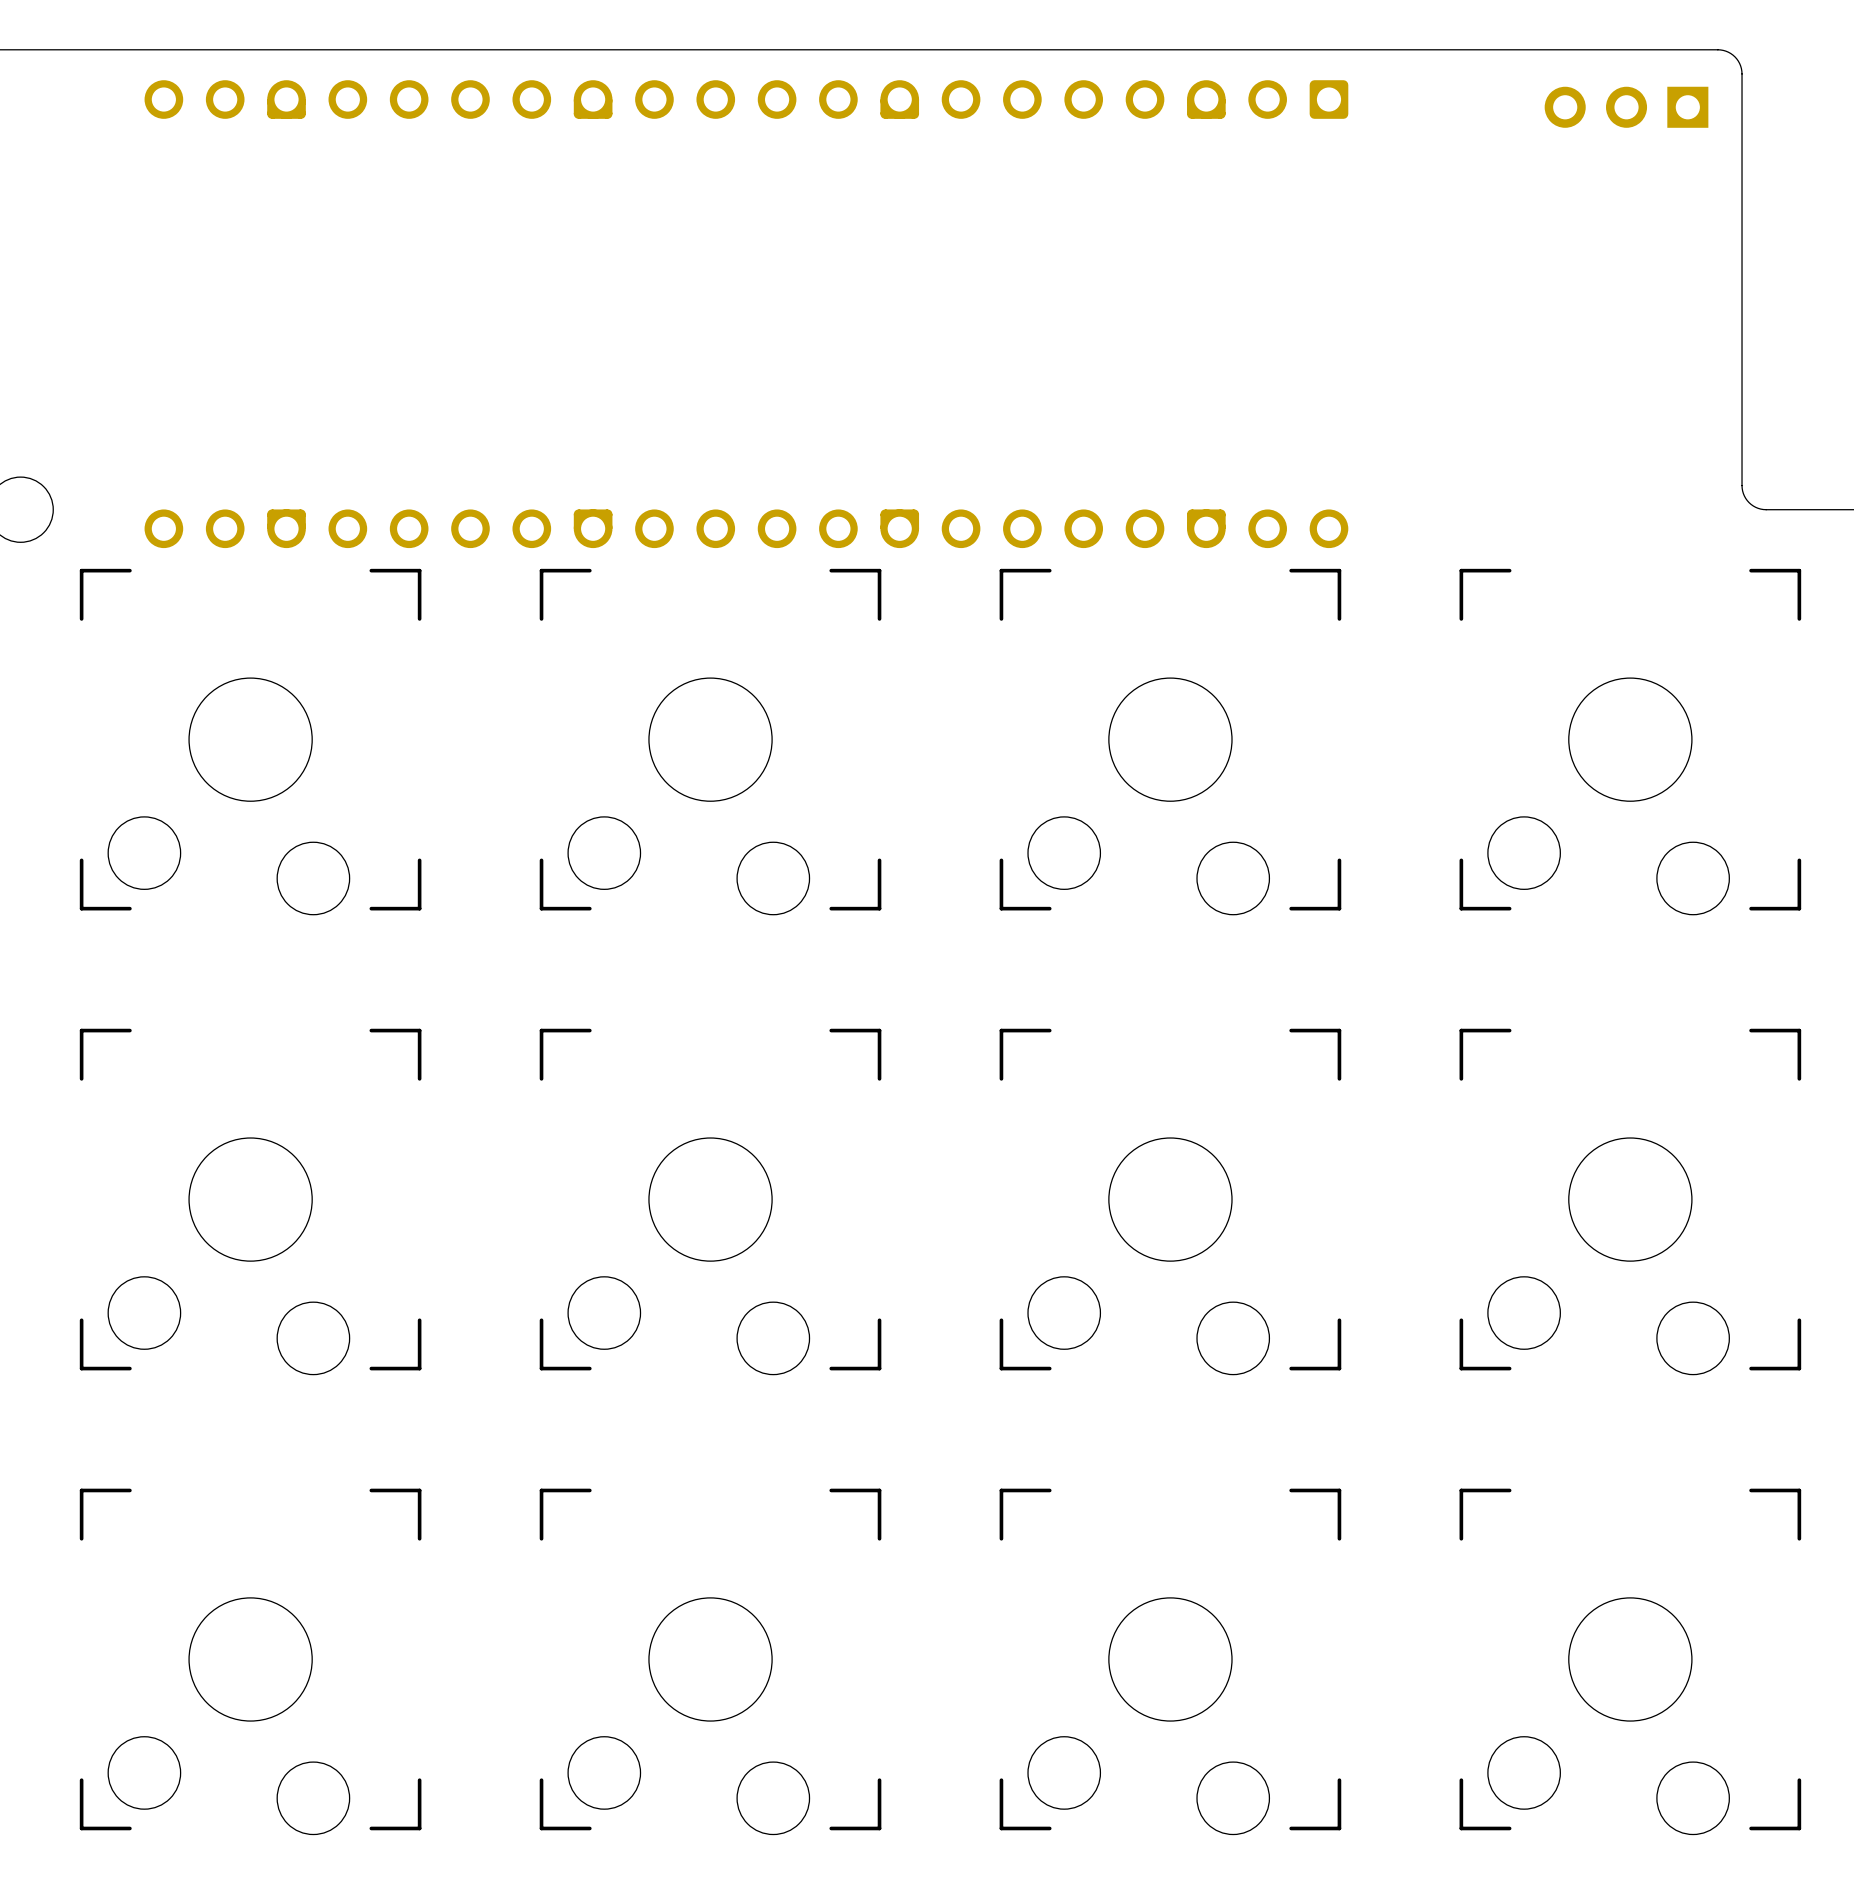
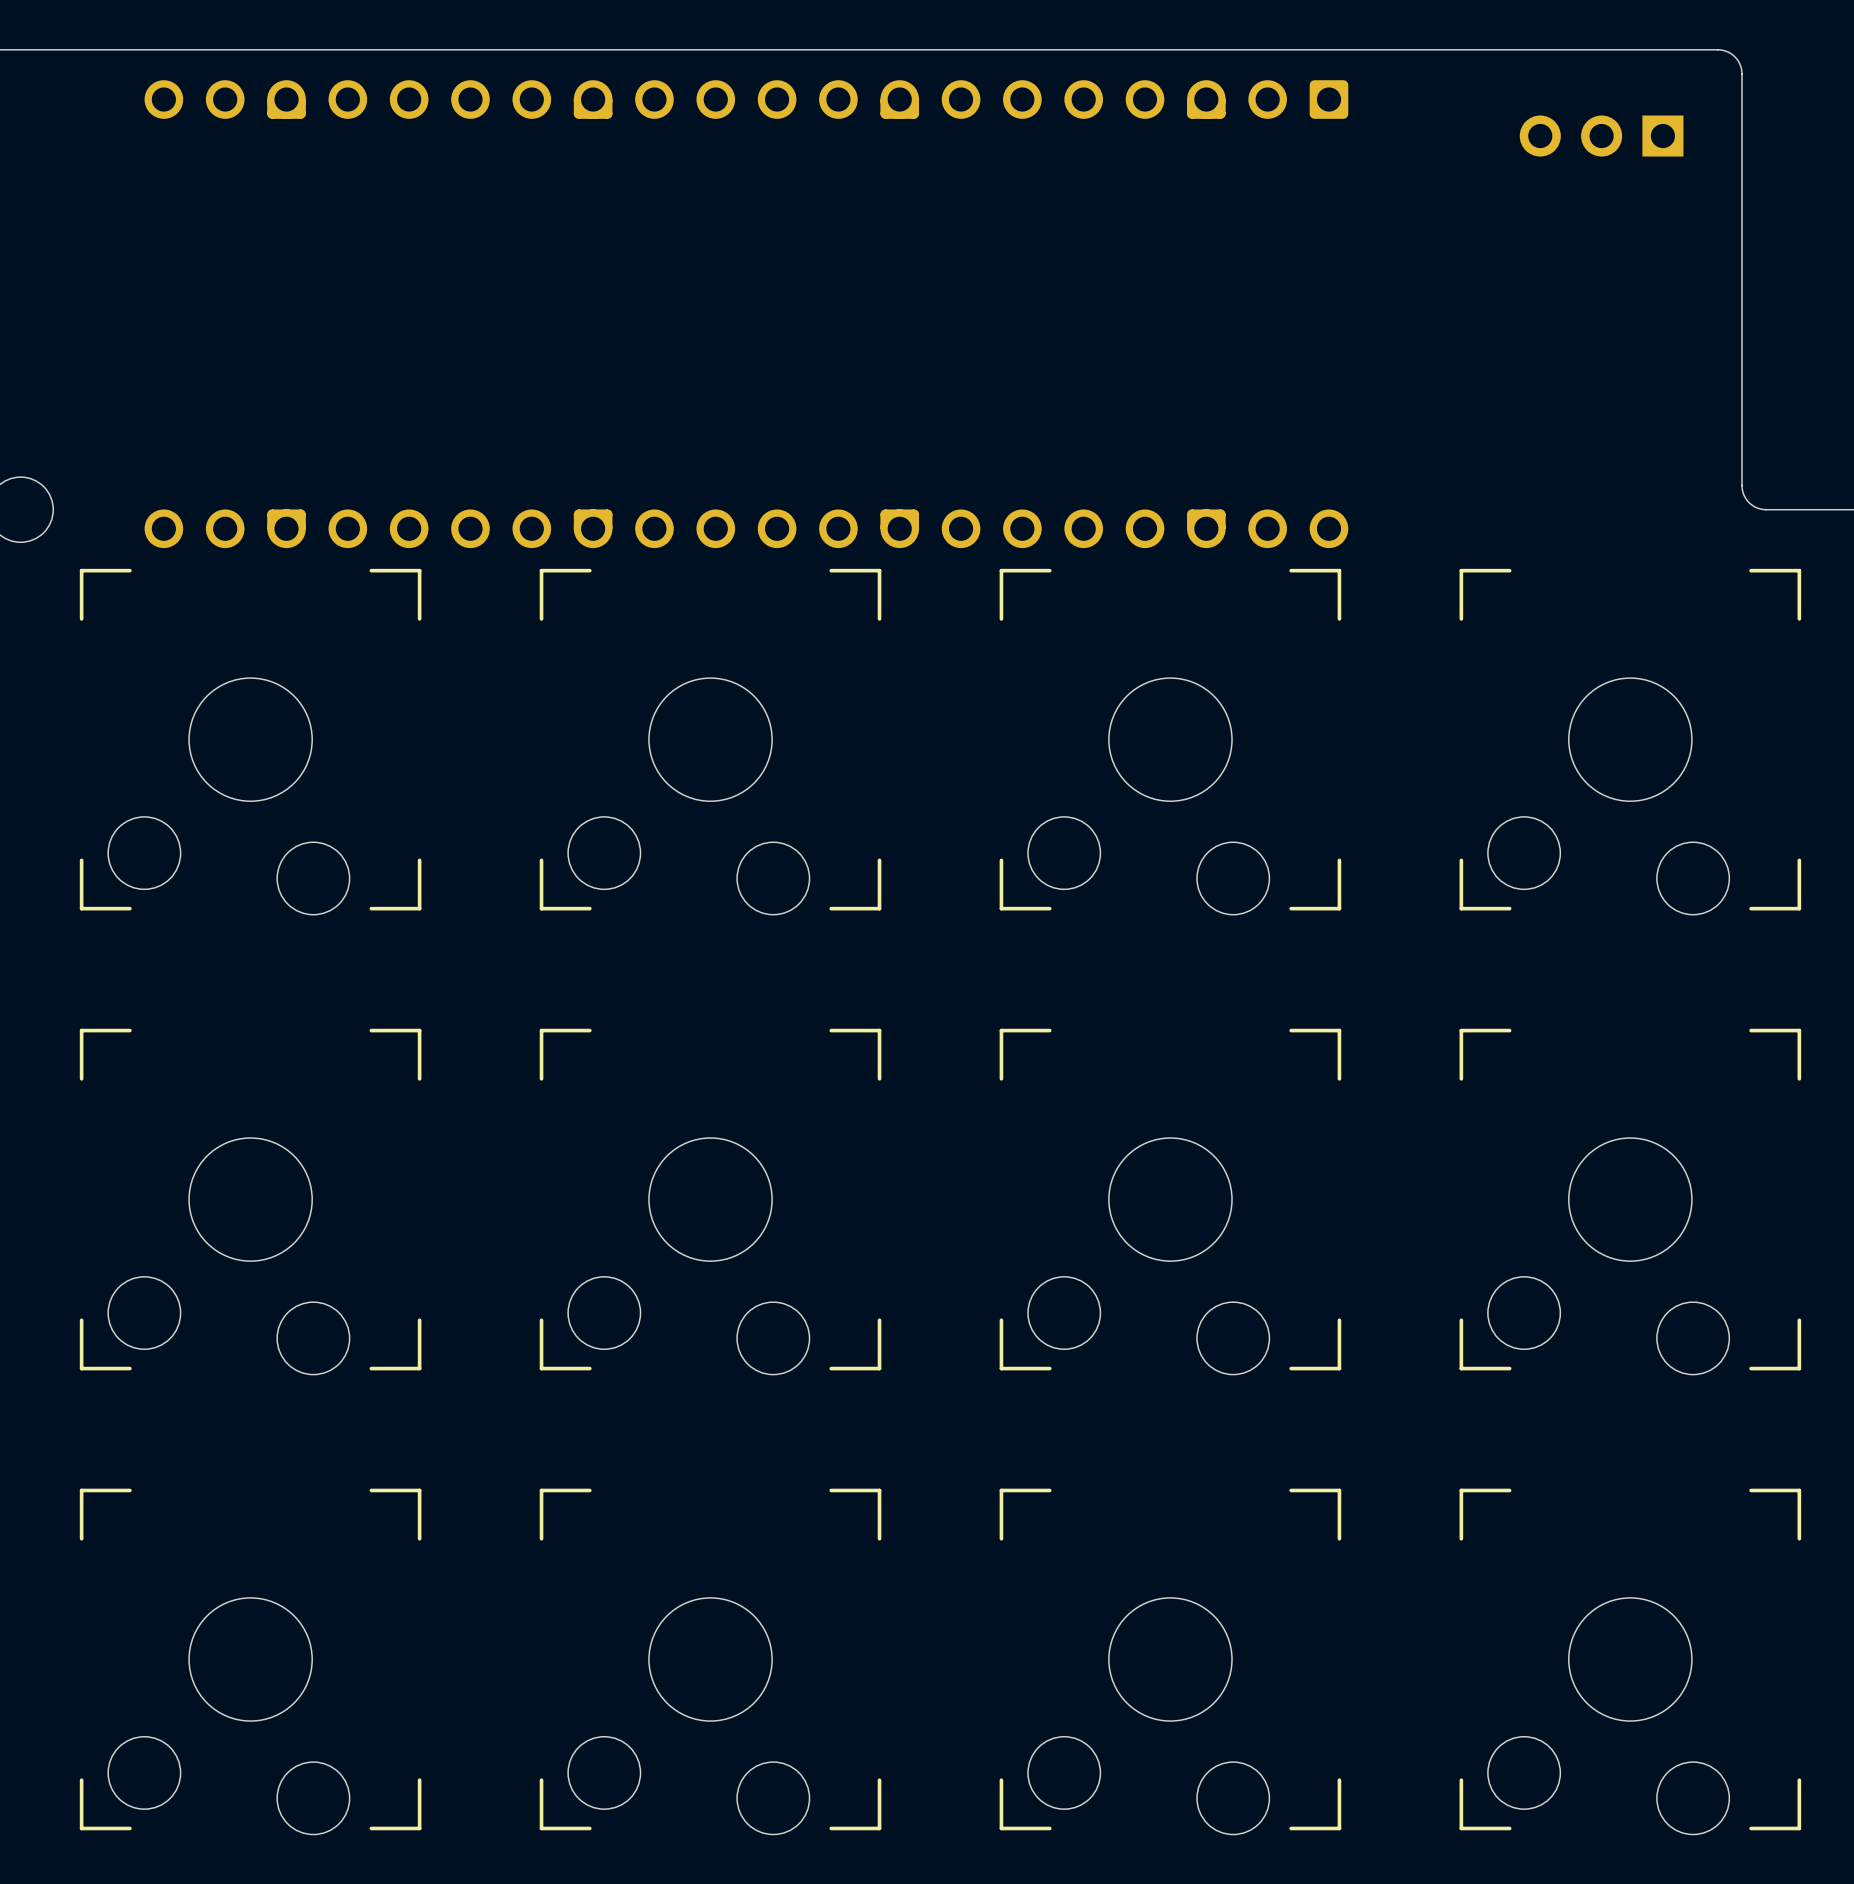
part position: (1626, 107) -> (1601, 136)

